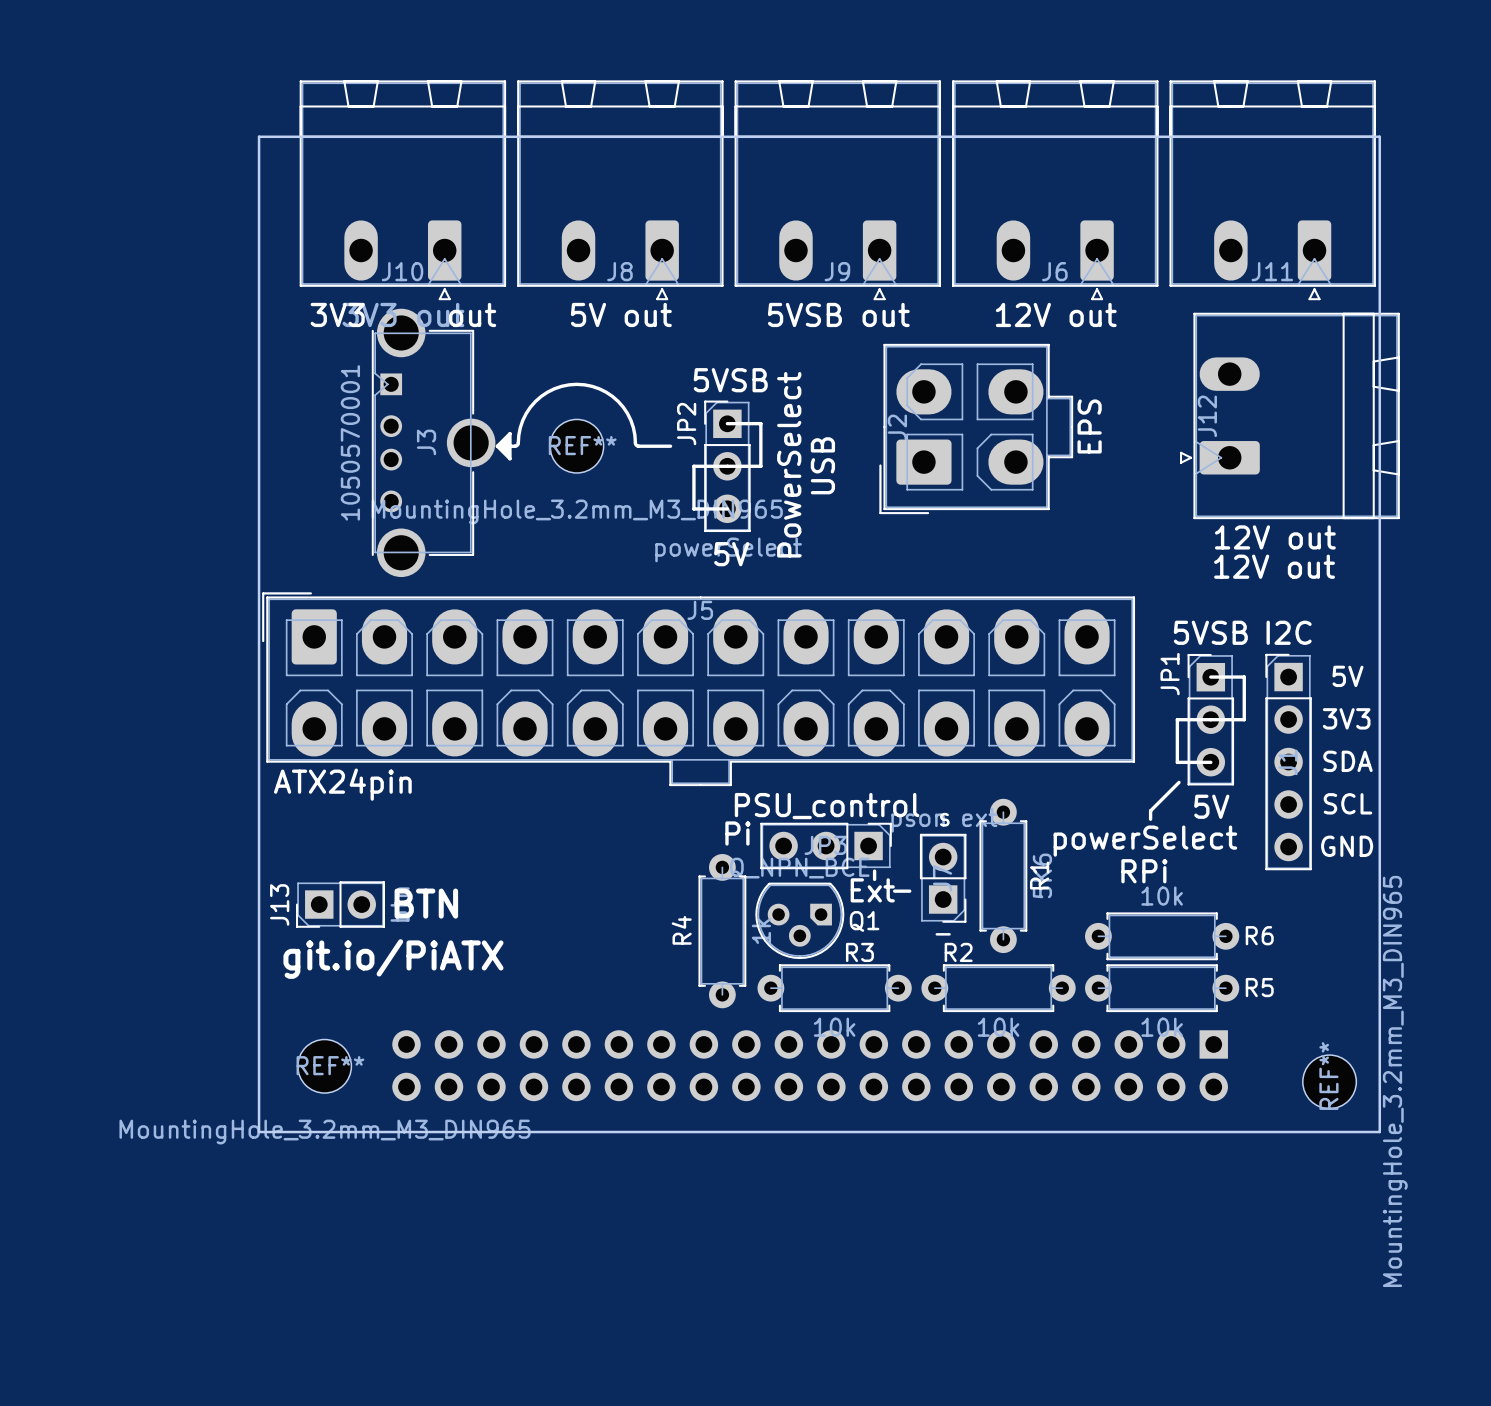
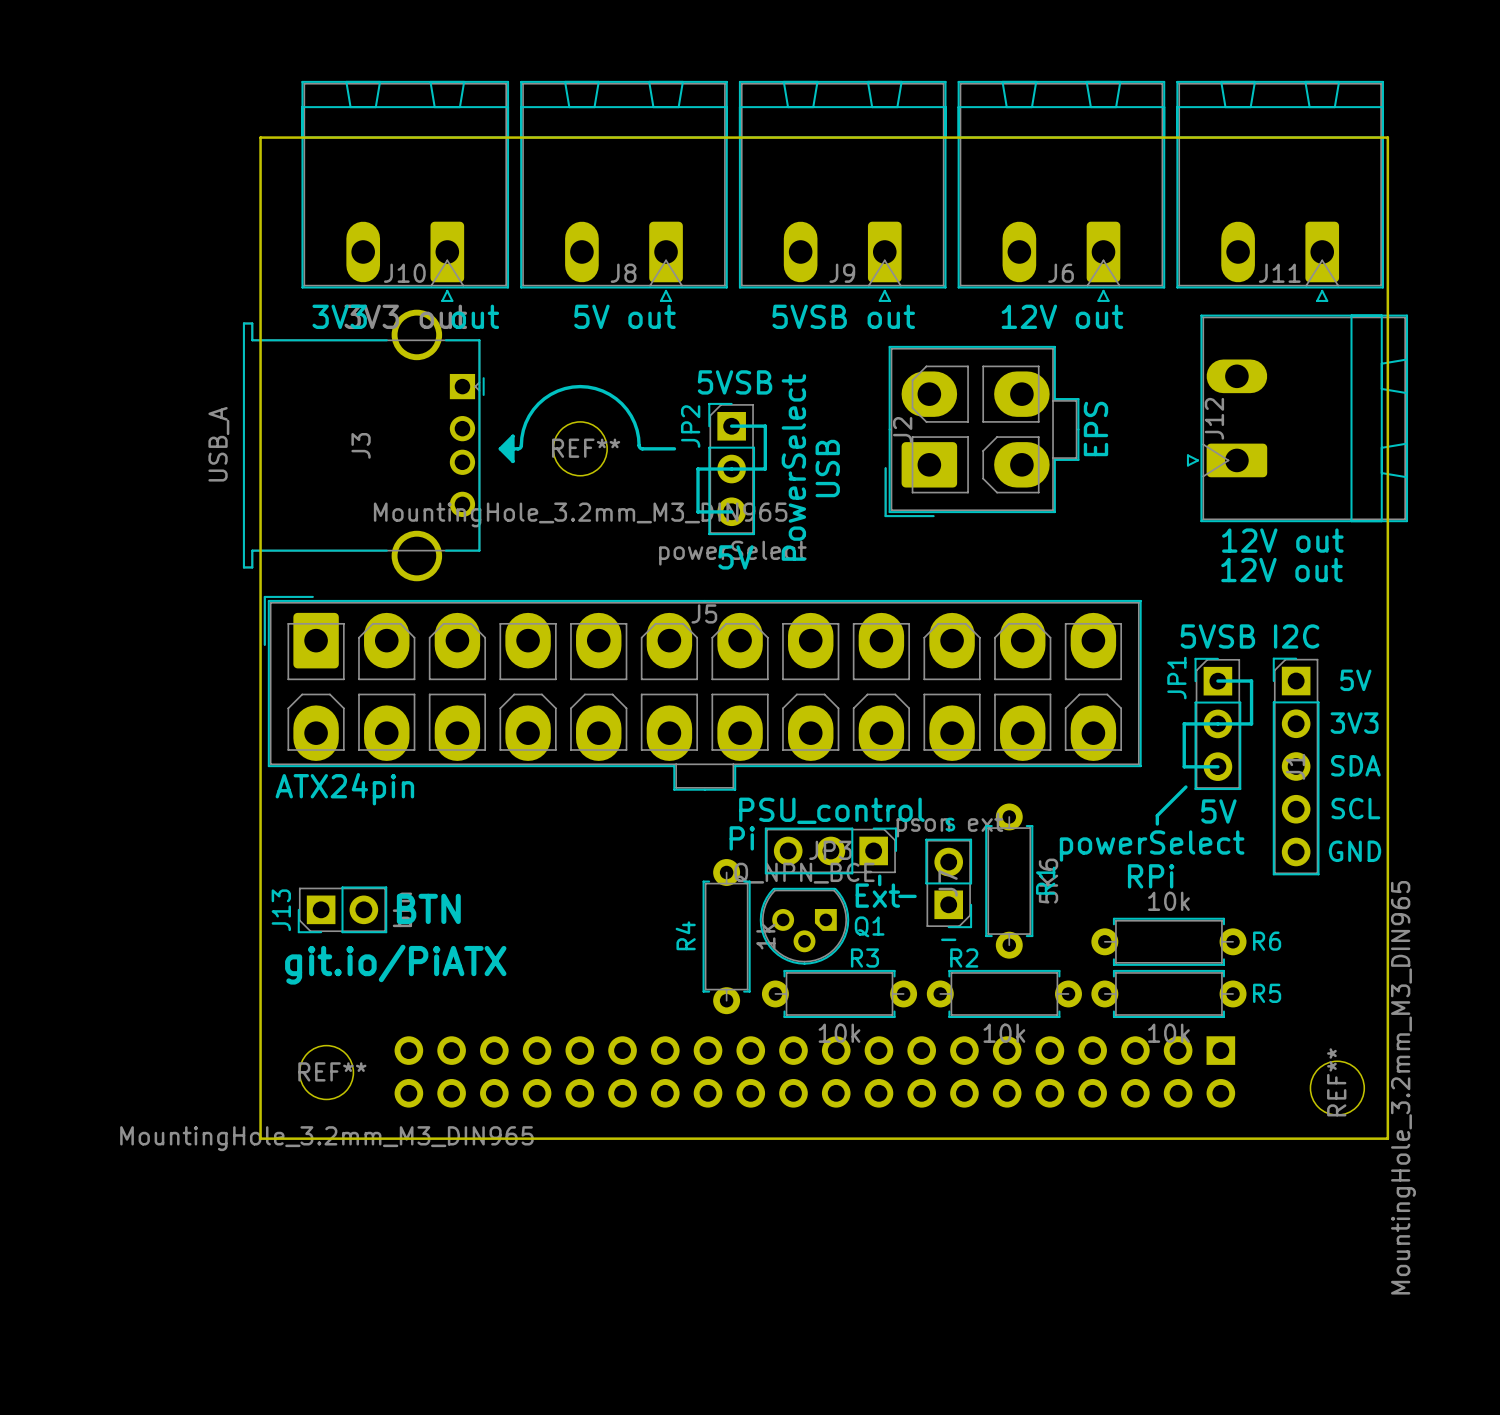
J3 footprint: [371, 308, 496, 578] -> [242, 309, 485, 582]
J3 value: 1050570001 (350, 442) -> USB_A (218, 444)

